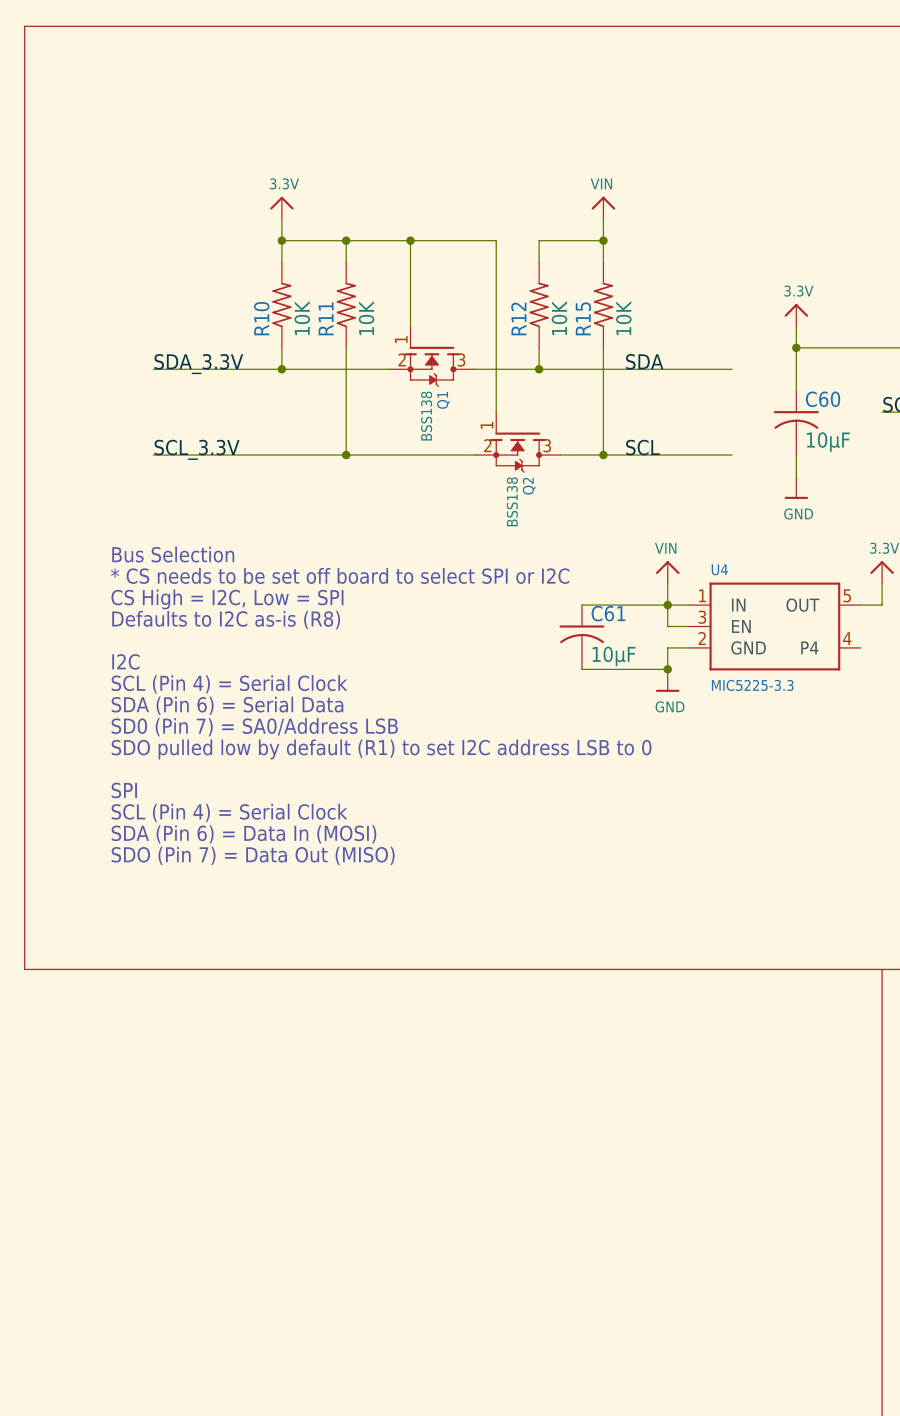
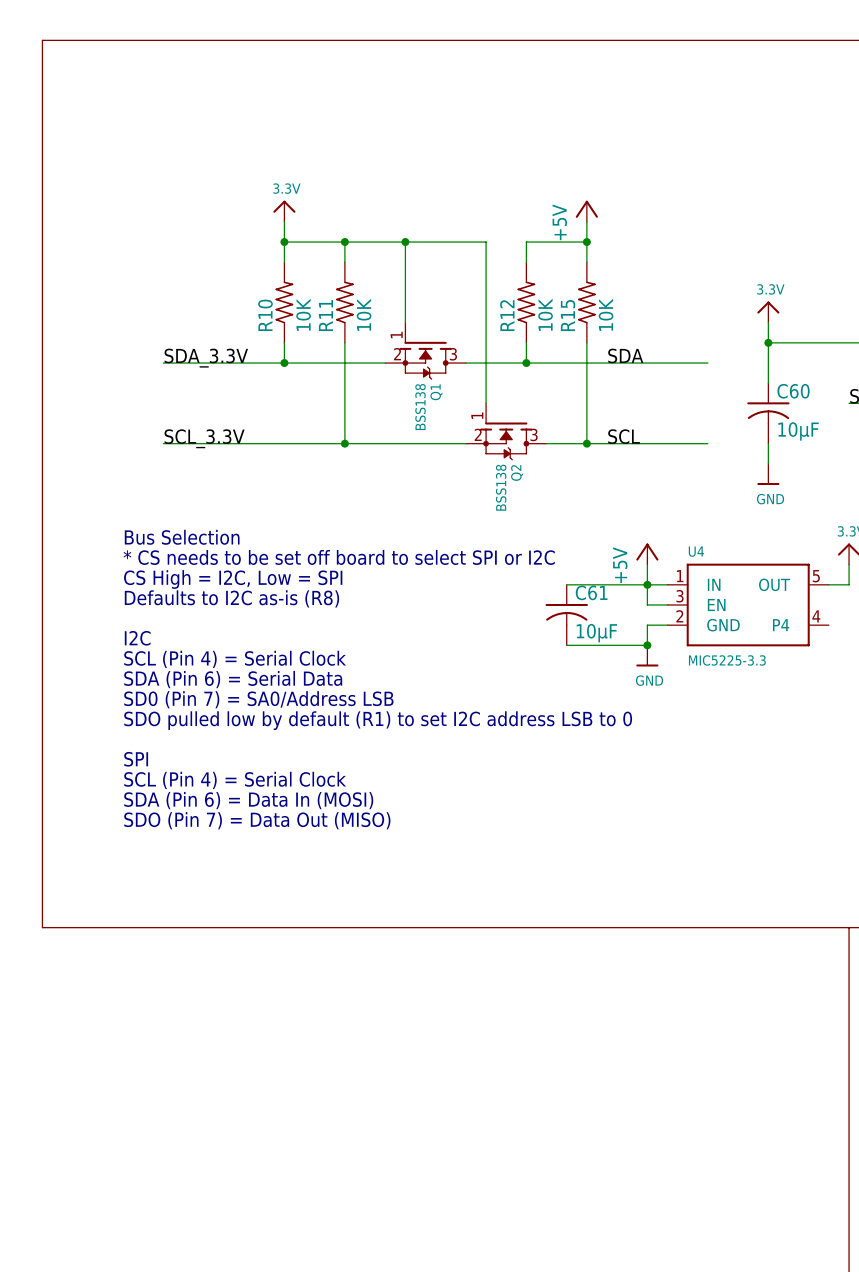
power symbol: VIN (603, 208) -> +5V (586, 211)
power symbol: VIN (667, 572) -> +5V (647, 554)

